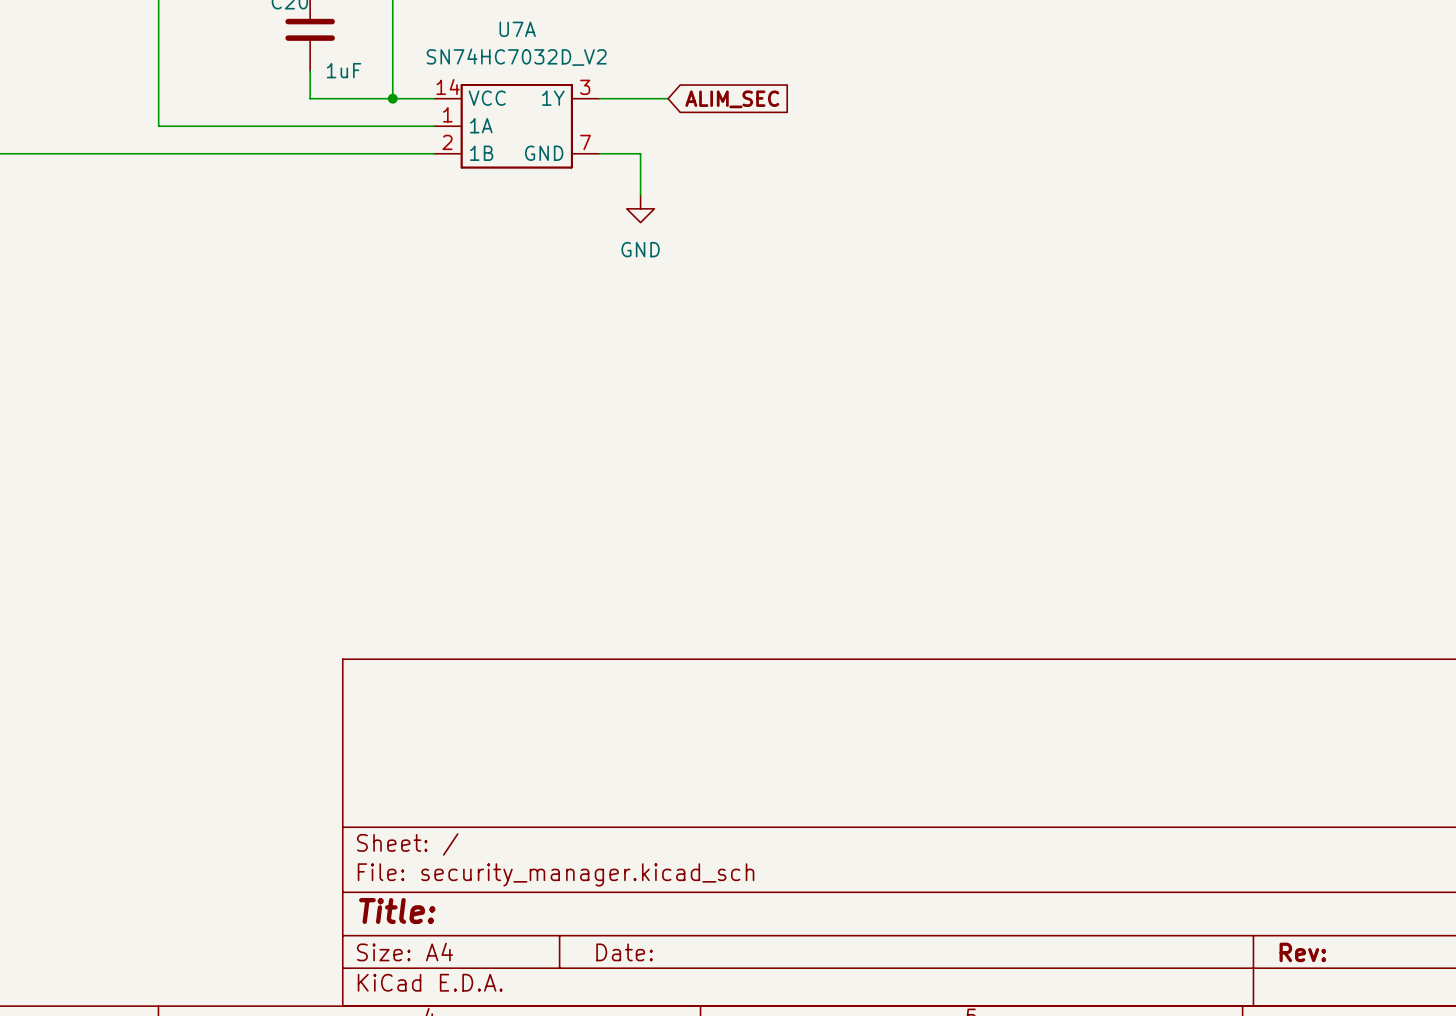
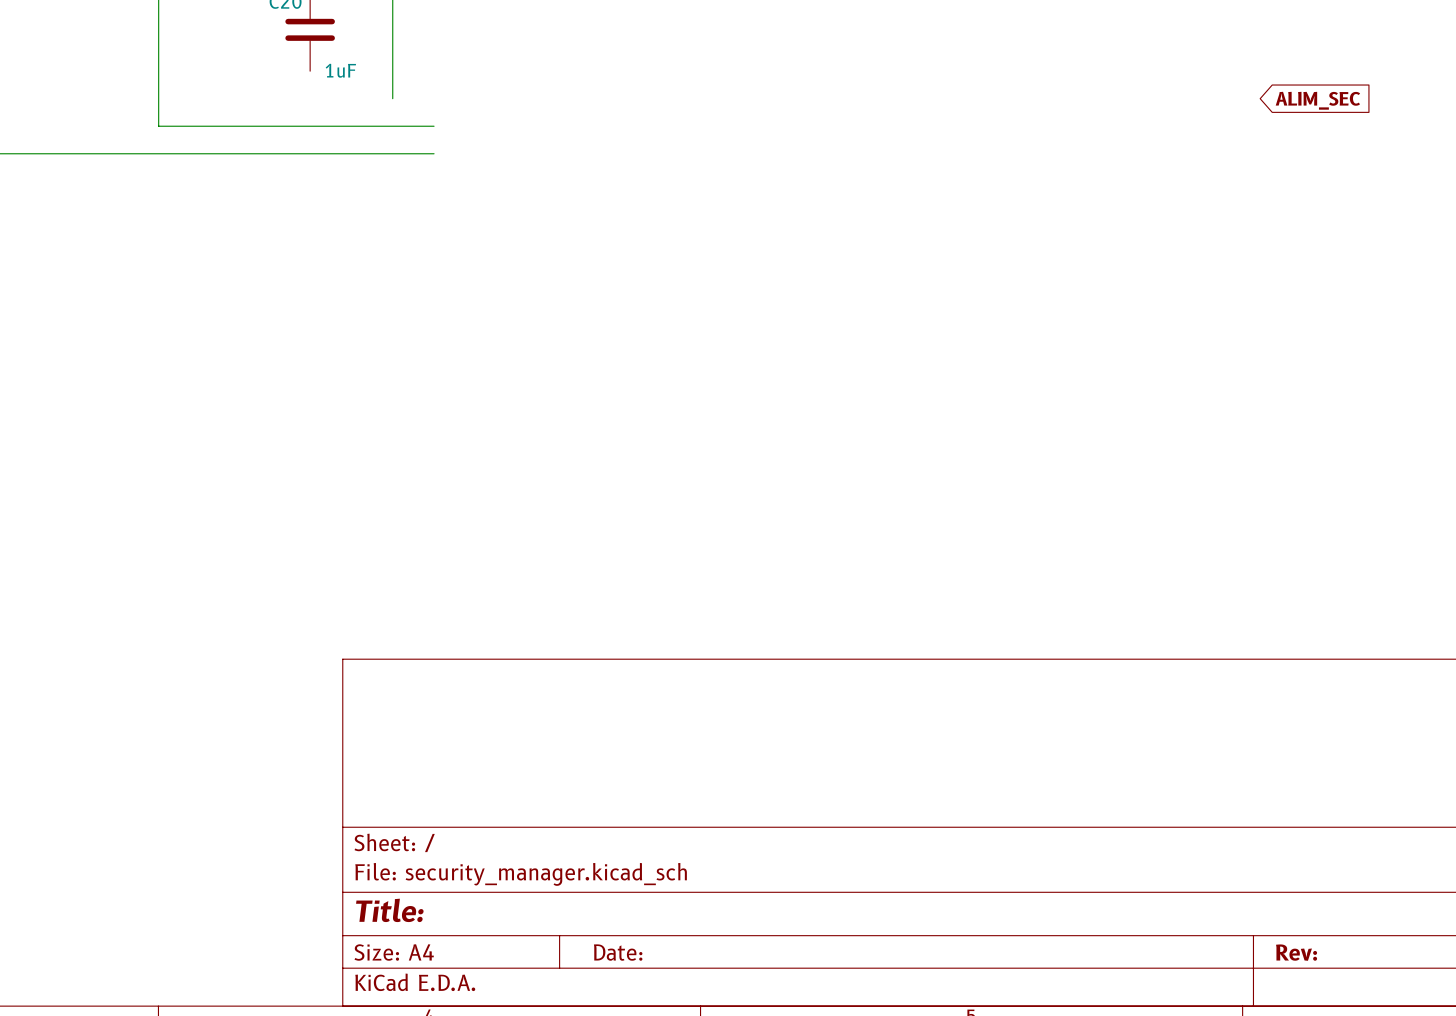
wire: (310, 71) (310, 98) (434, 98) -> none
junction: (392, 98) -> none
wire: (599, 98) (668, 98) -> none
global label: ALIM_SEC (732, 99) -> none
global label: none -> ALIM_SEC (1317, 100)
U7A: SN74HC7032D_V2 (516, 126) -> none
wire: (599, 153) (640, 153) (640, 195) -> none
power symbol: GND (640, 208) -> none

